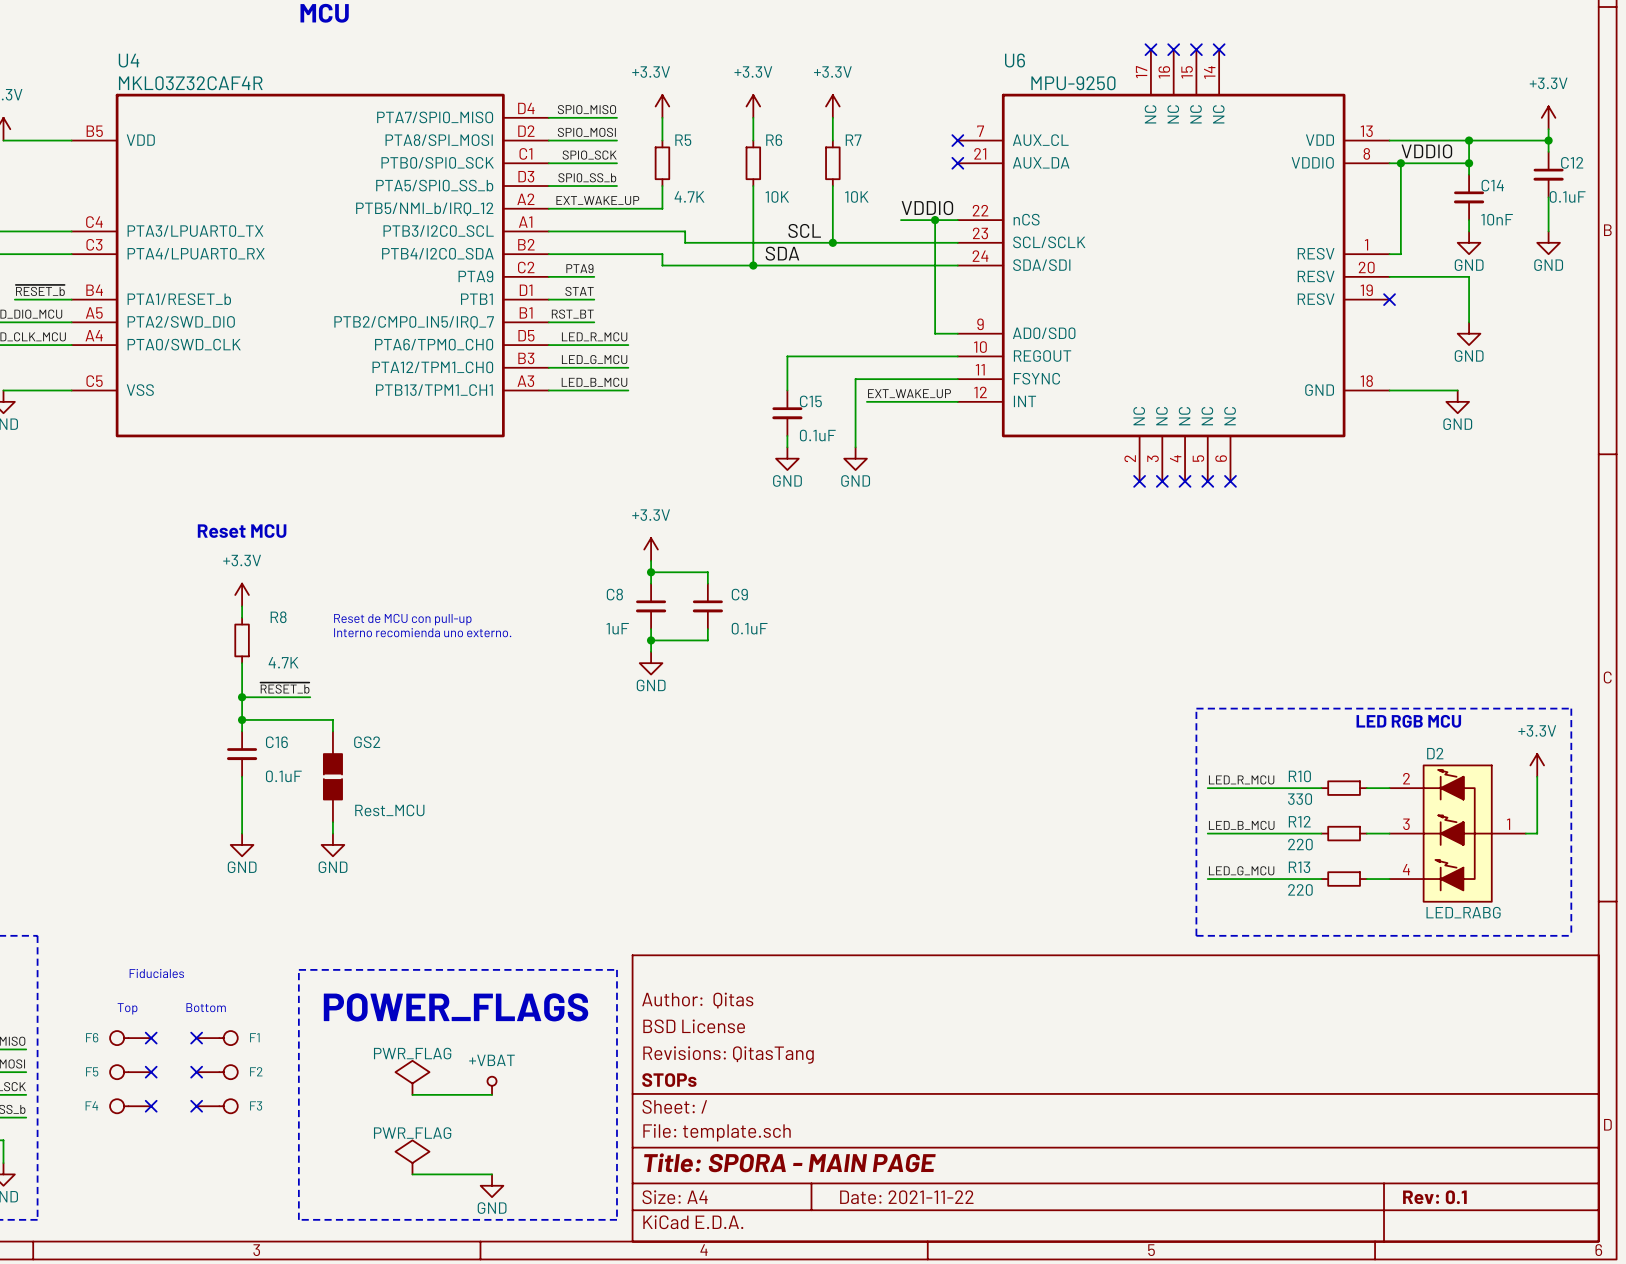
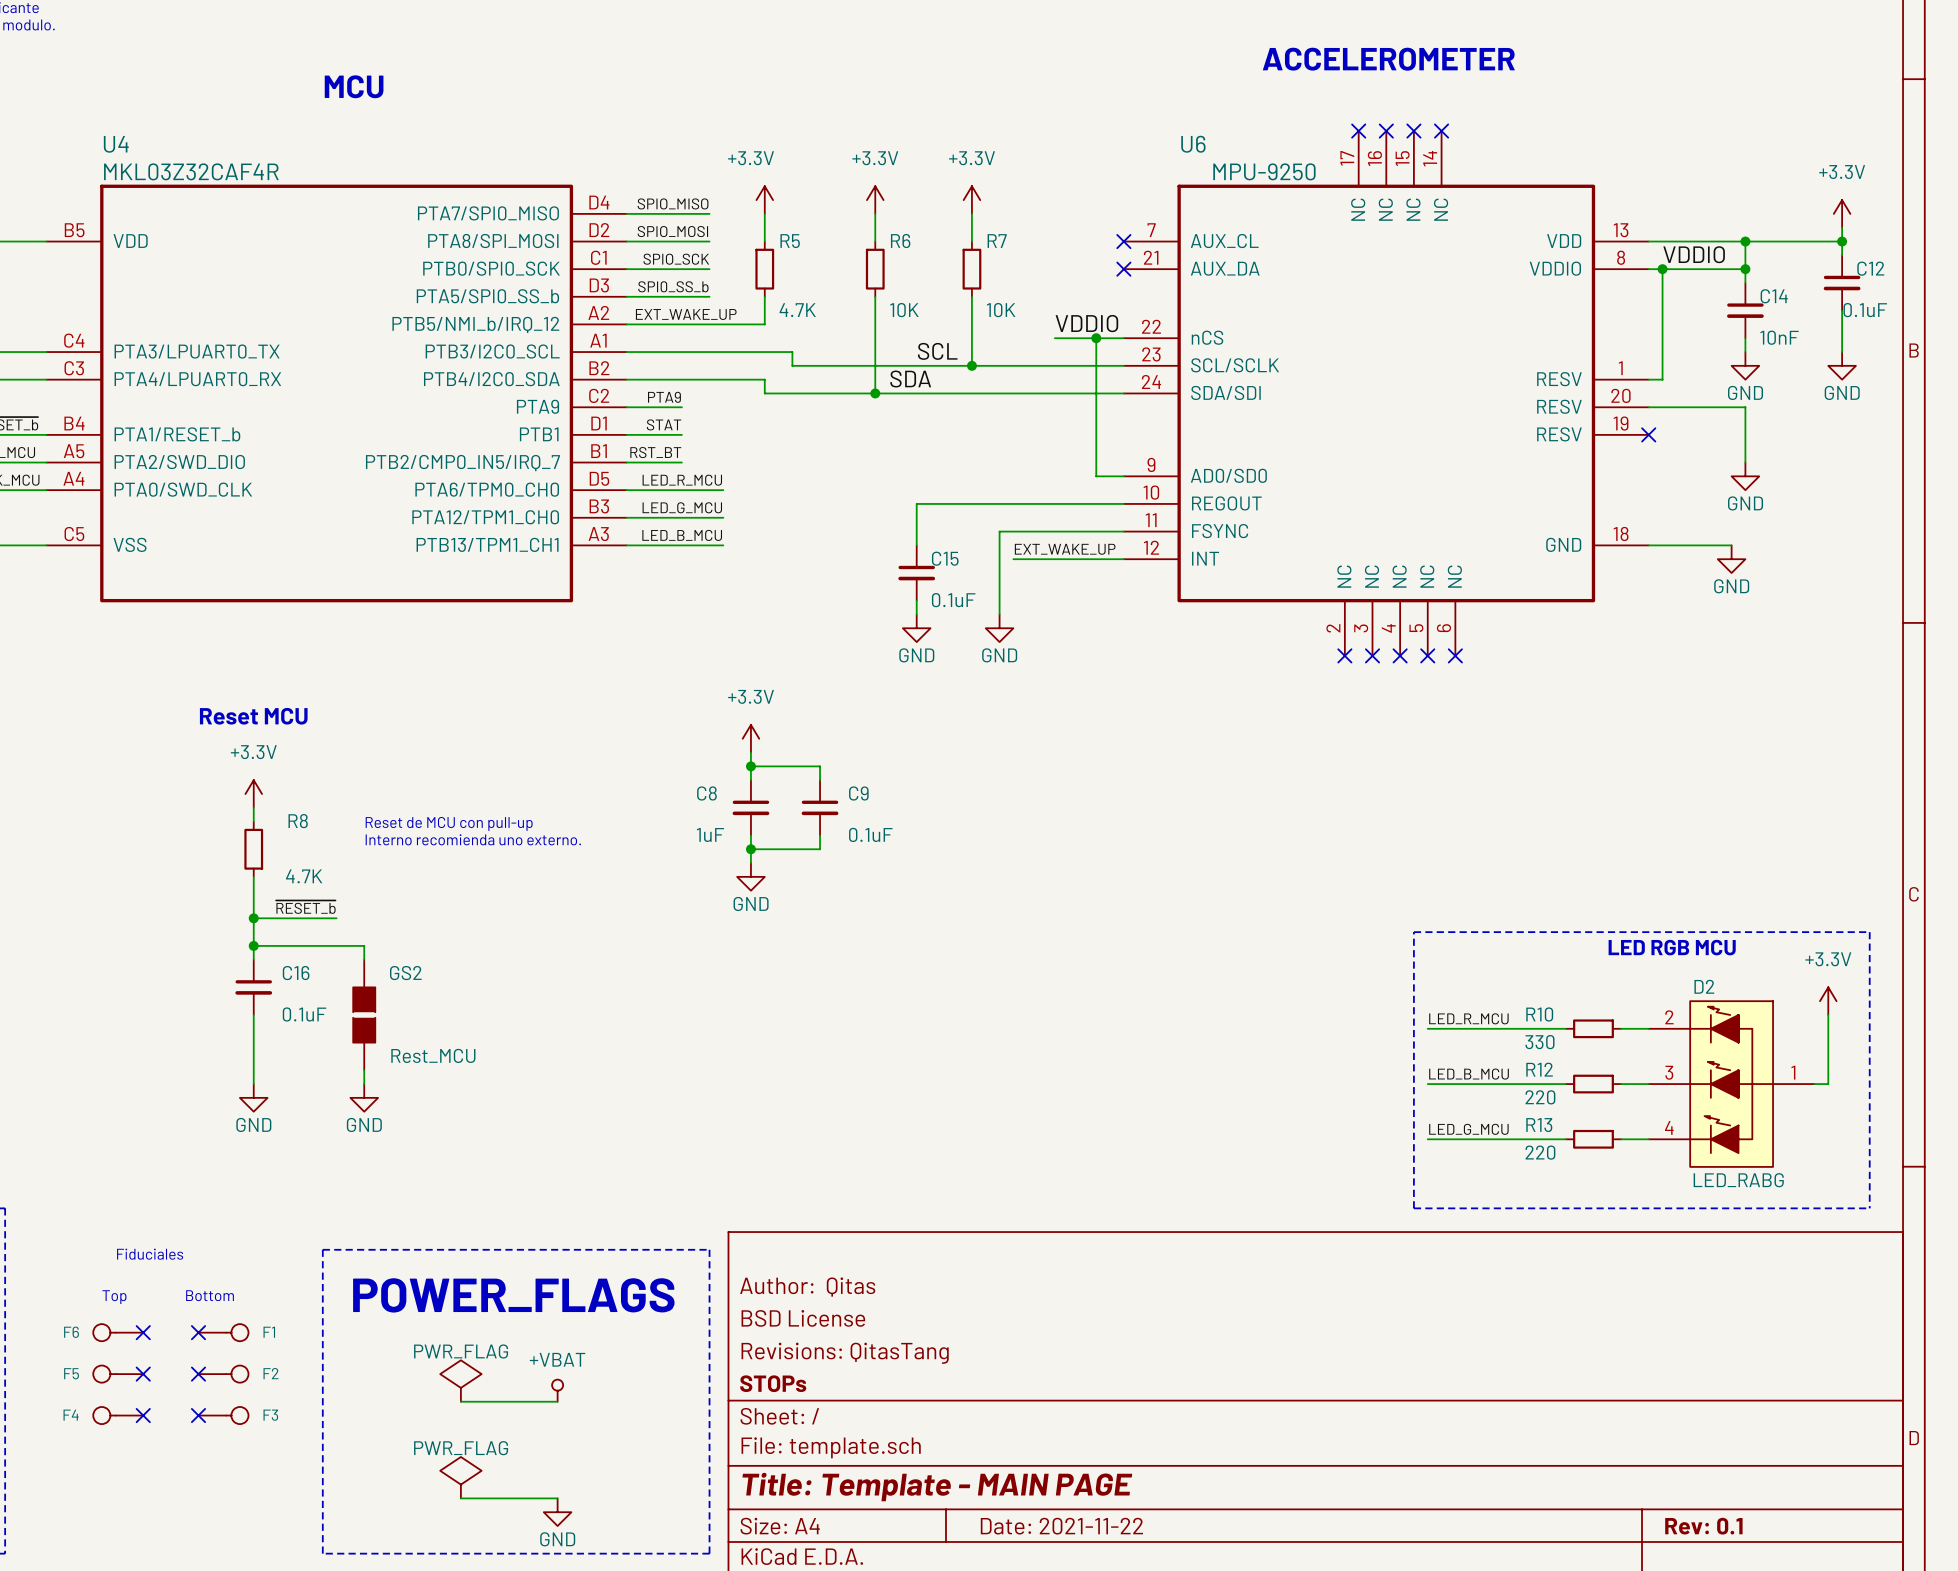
title block: Title: SPORA - MAIN PAGE (789, 1162) -> Title: Template - MAIN PAGE (937, 1487)

